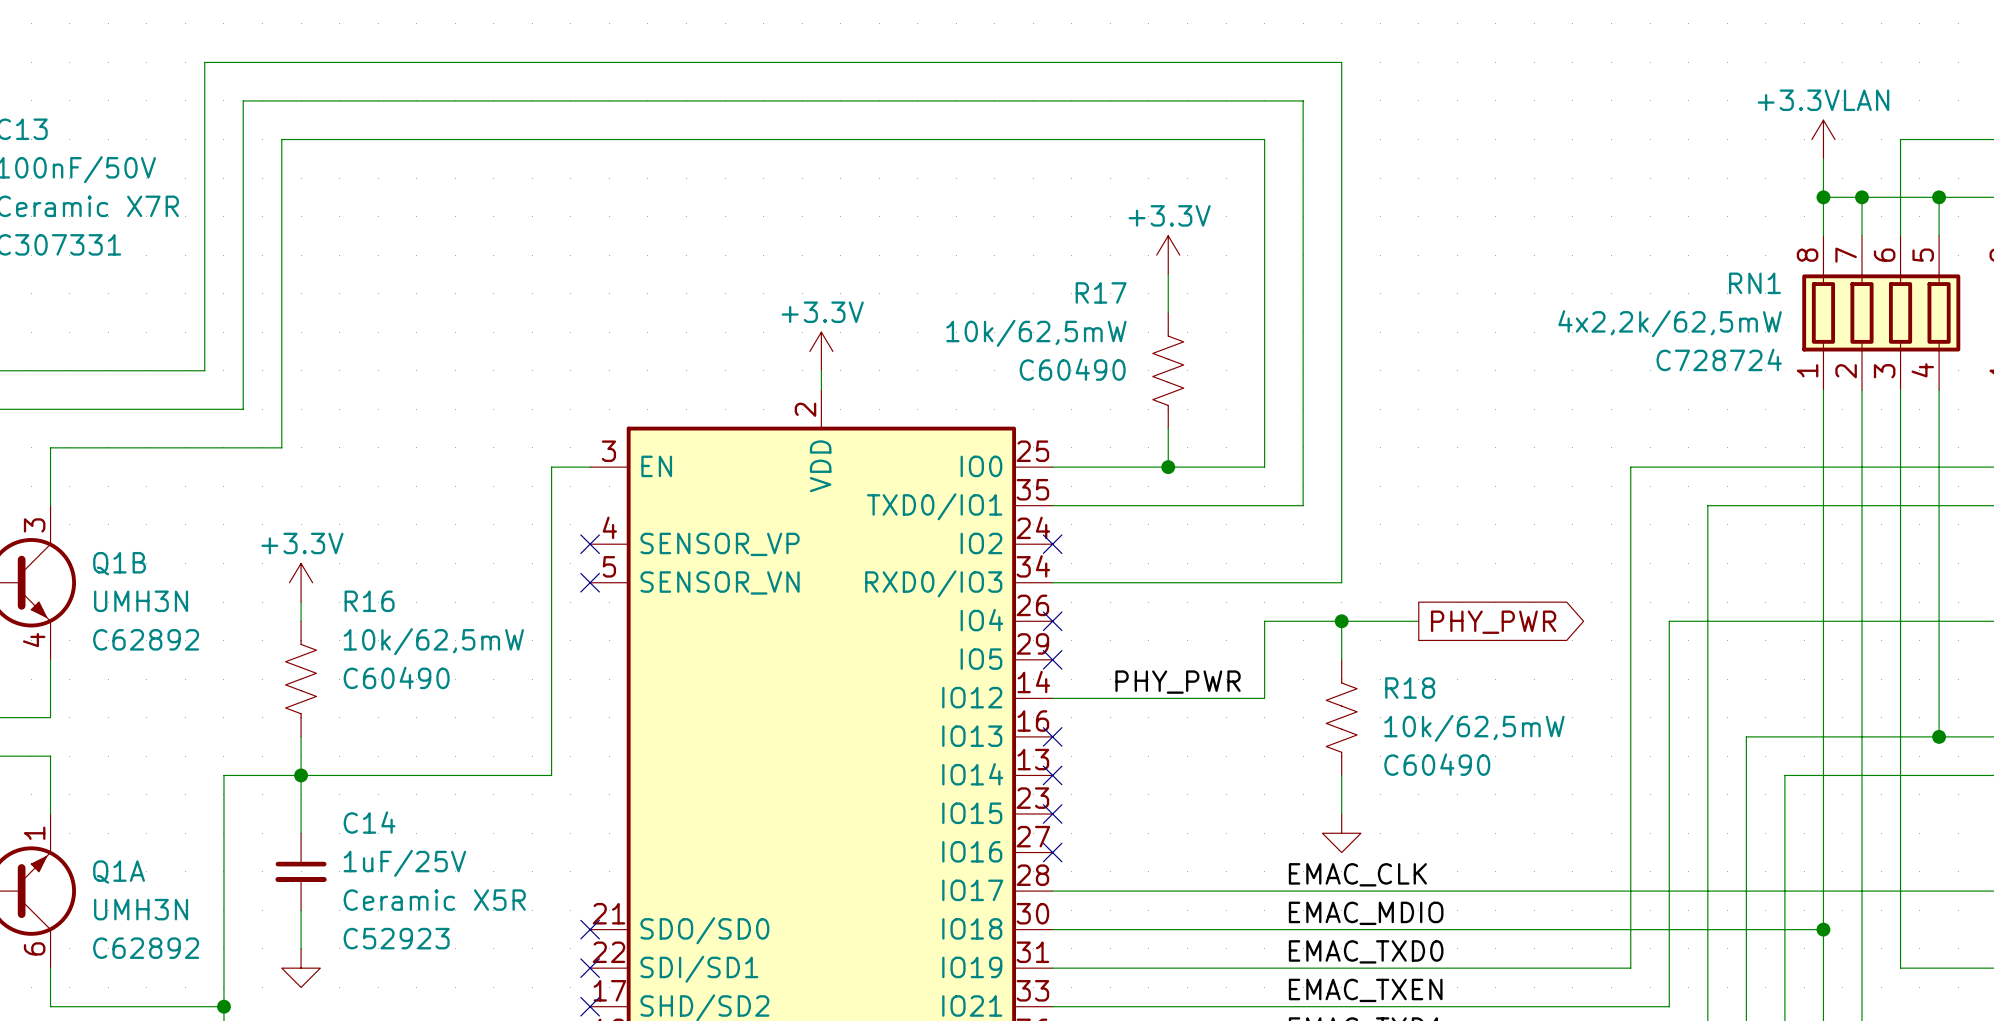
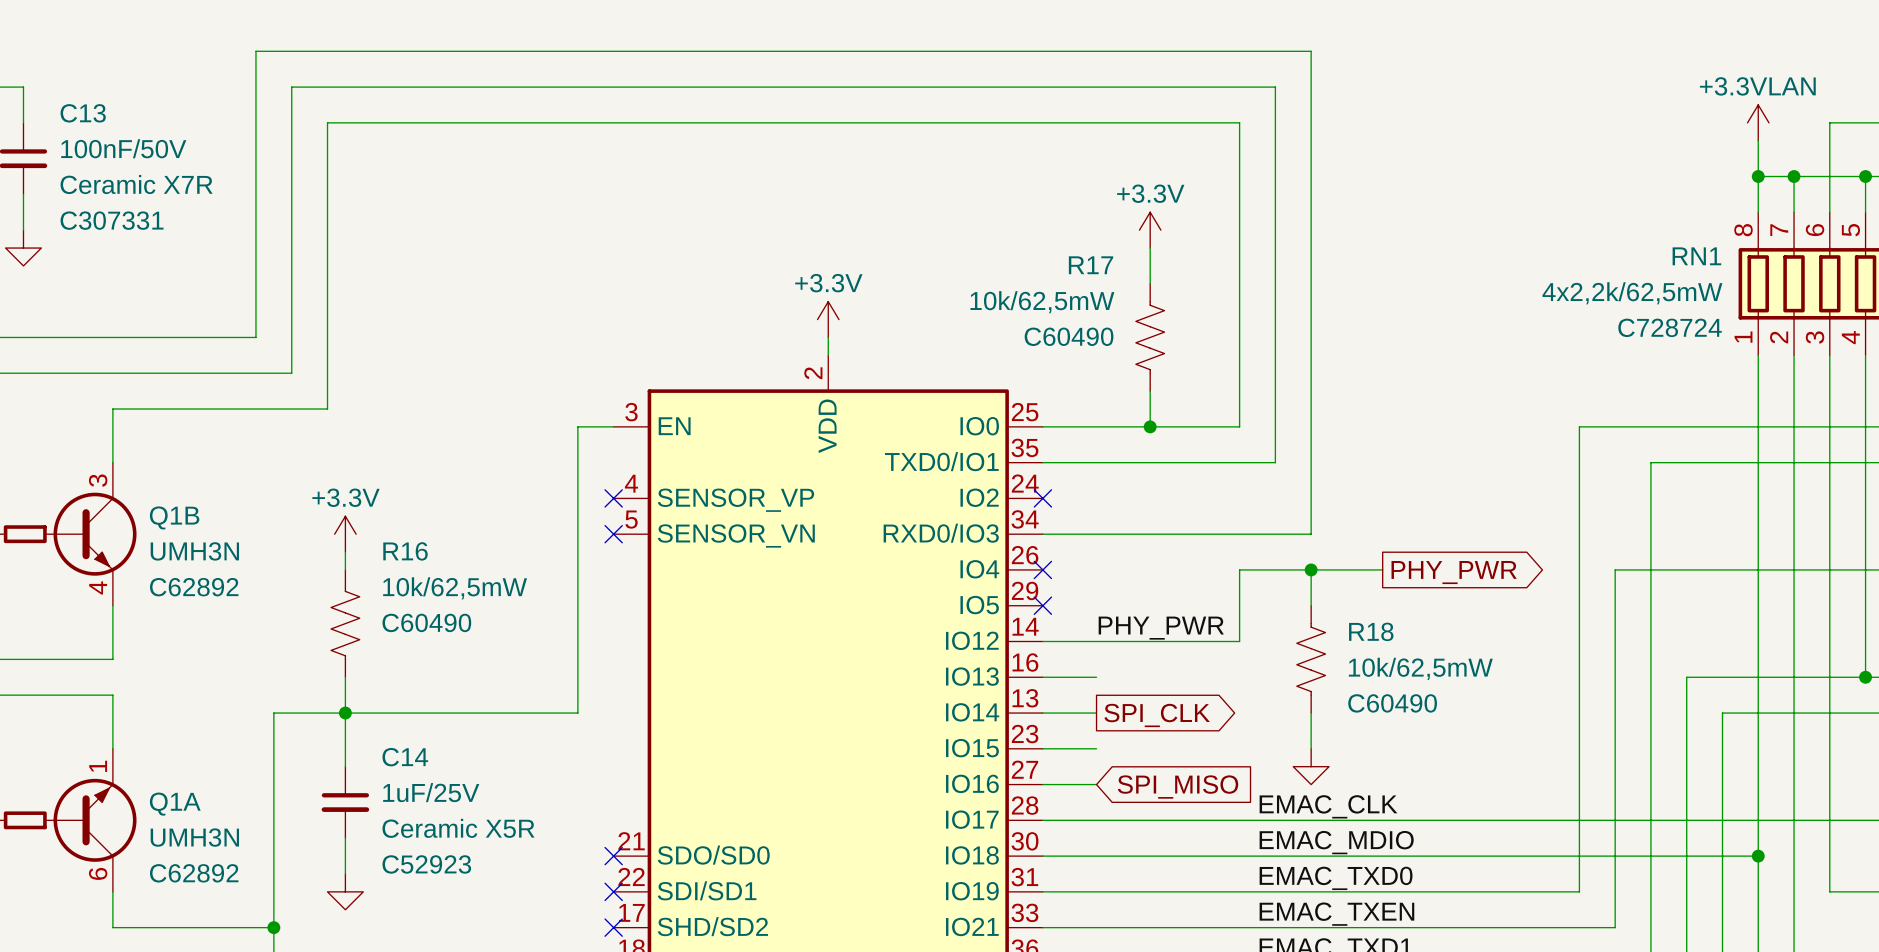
wire: none -> (1042, 677) (1096, 677)
no-connect mark: (1052, 736) -> none
wire: none -> (1042, 713) (1096, 713)
no-connect mark: (1052, 775) -> none
global label: none -> SPI_CLK (1157, 715)
wire: none -> (1042, 748) (1096, 748)
no-connect mark: (1052, 813) -> none
wire: none -> (1042, 784) (1096, 784)
no-connect mark: (1052, 852) -> none
global label: none -> SPI_MISO (1178, 787)

